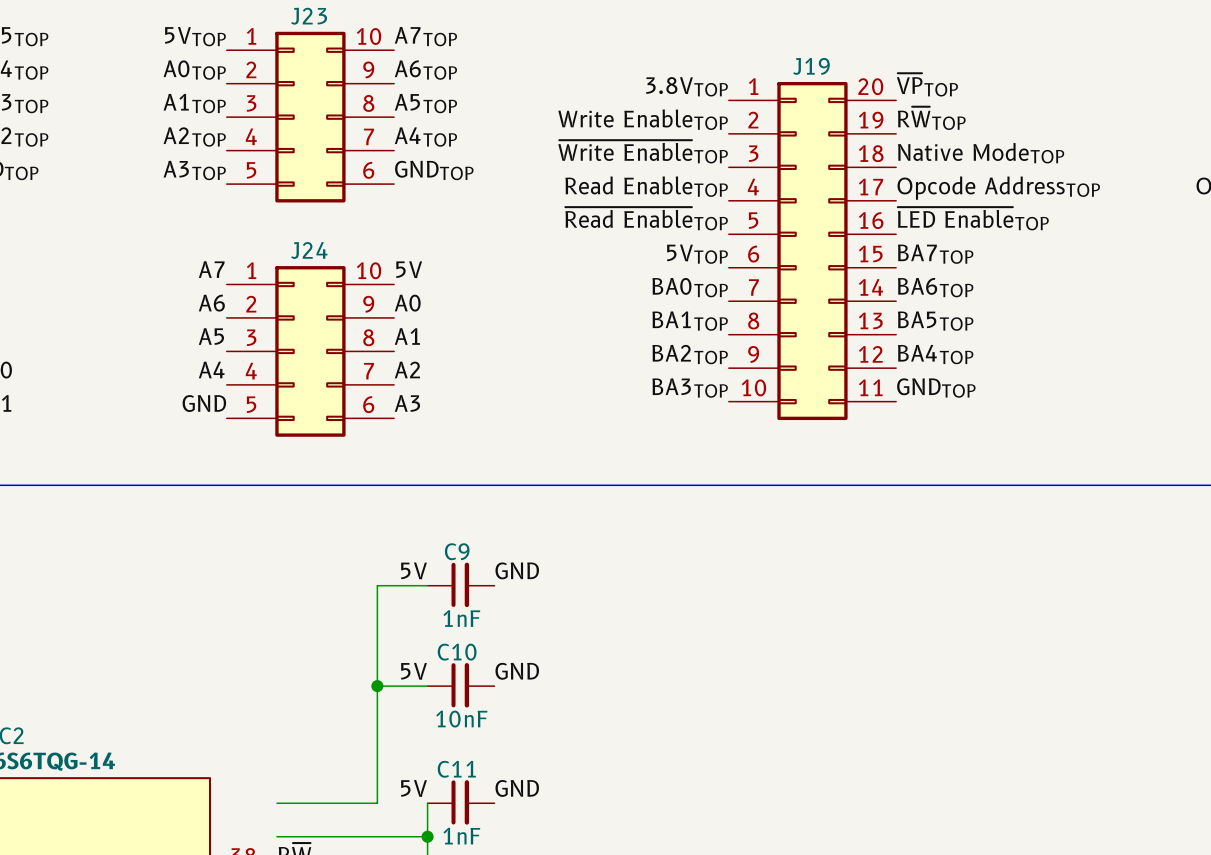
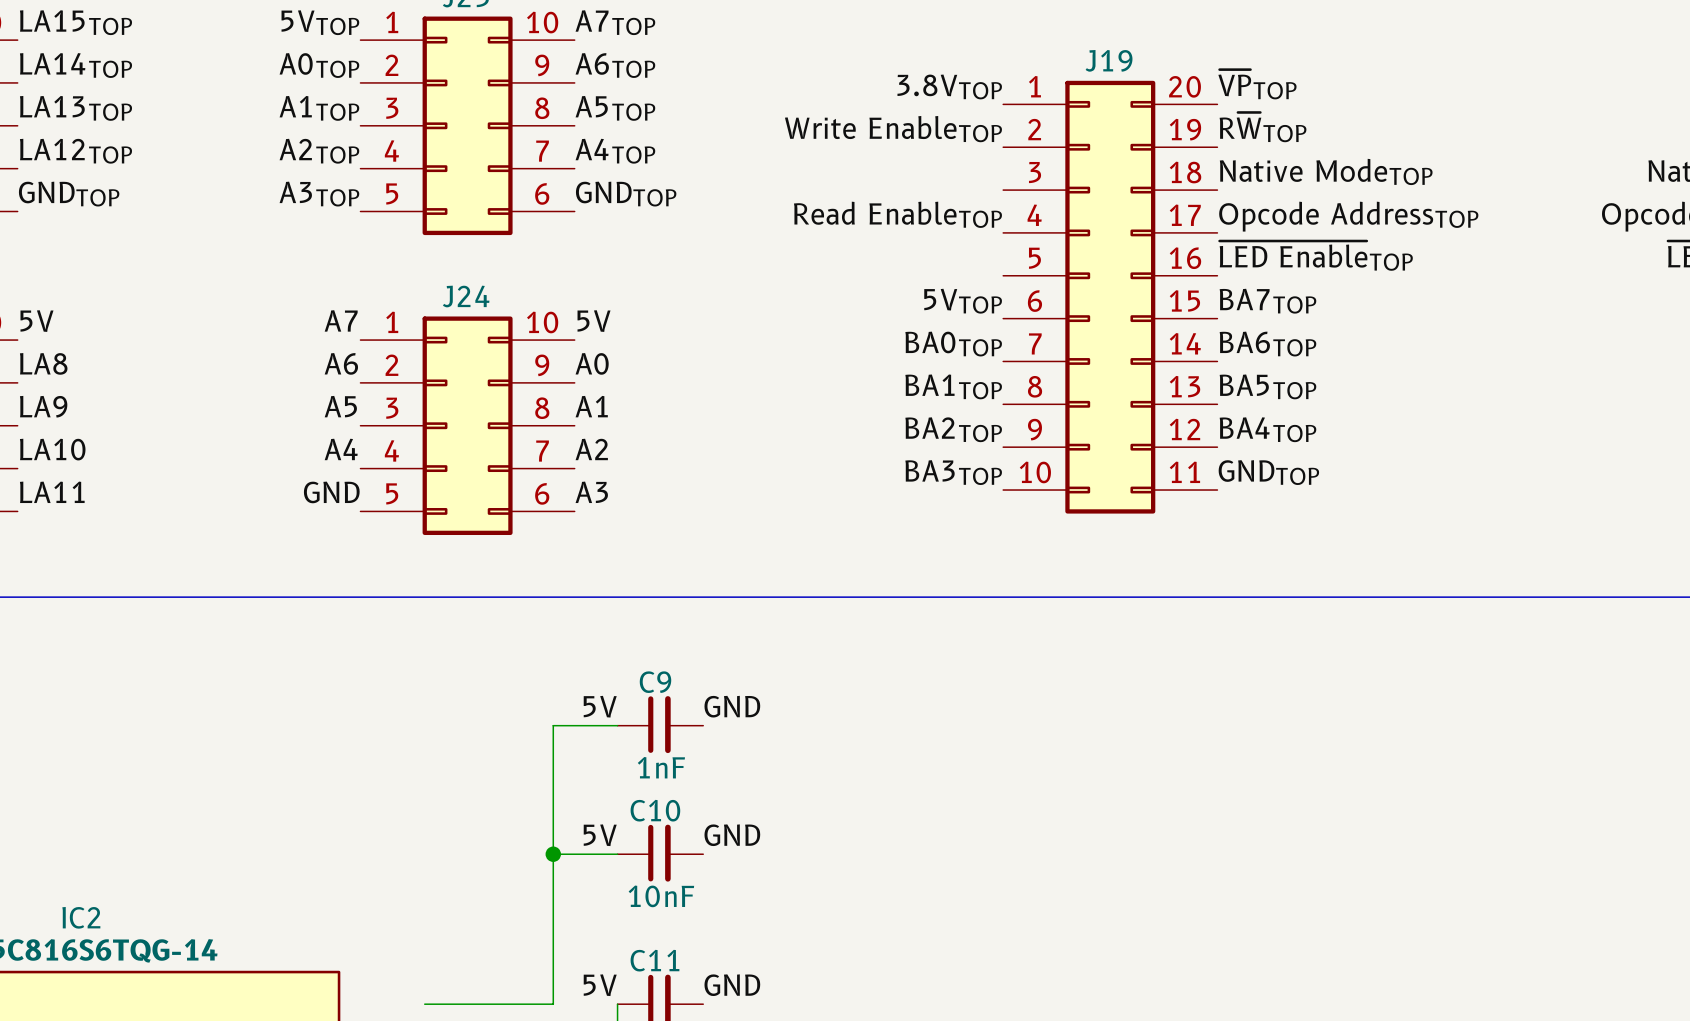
label: ~{Write Enable}TOP (643, 151) -> none
label: ~{Read Enable}TOP (646, 218) -> none

